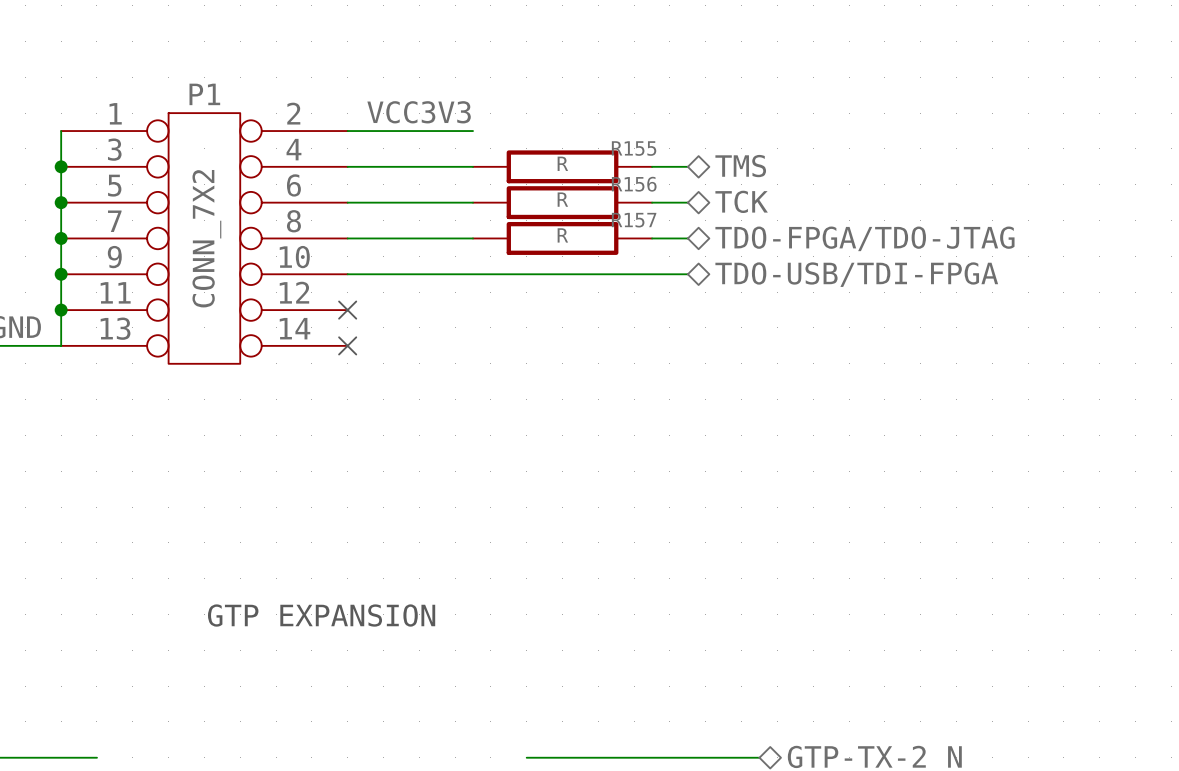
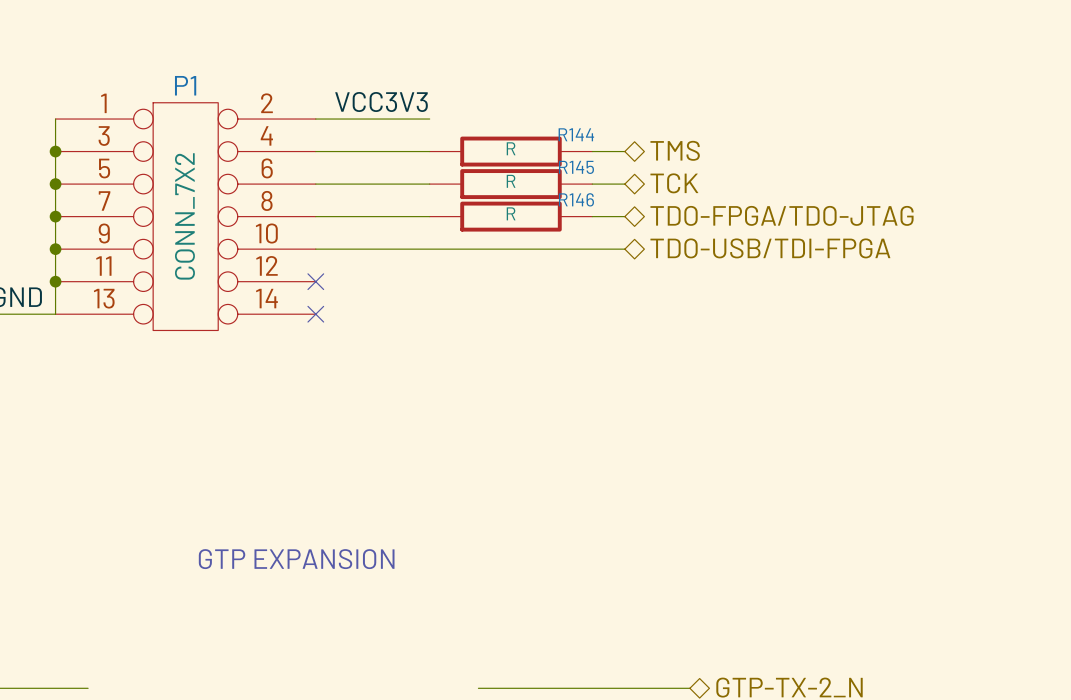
R155 name: R155 (634, 148) -> R144 (576, 134)
R156 name: R156 (634, 184) -> R145 (576, 167)
R157 name: R157 (634, 220) -> R146 (576, 199)

